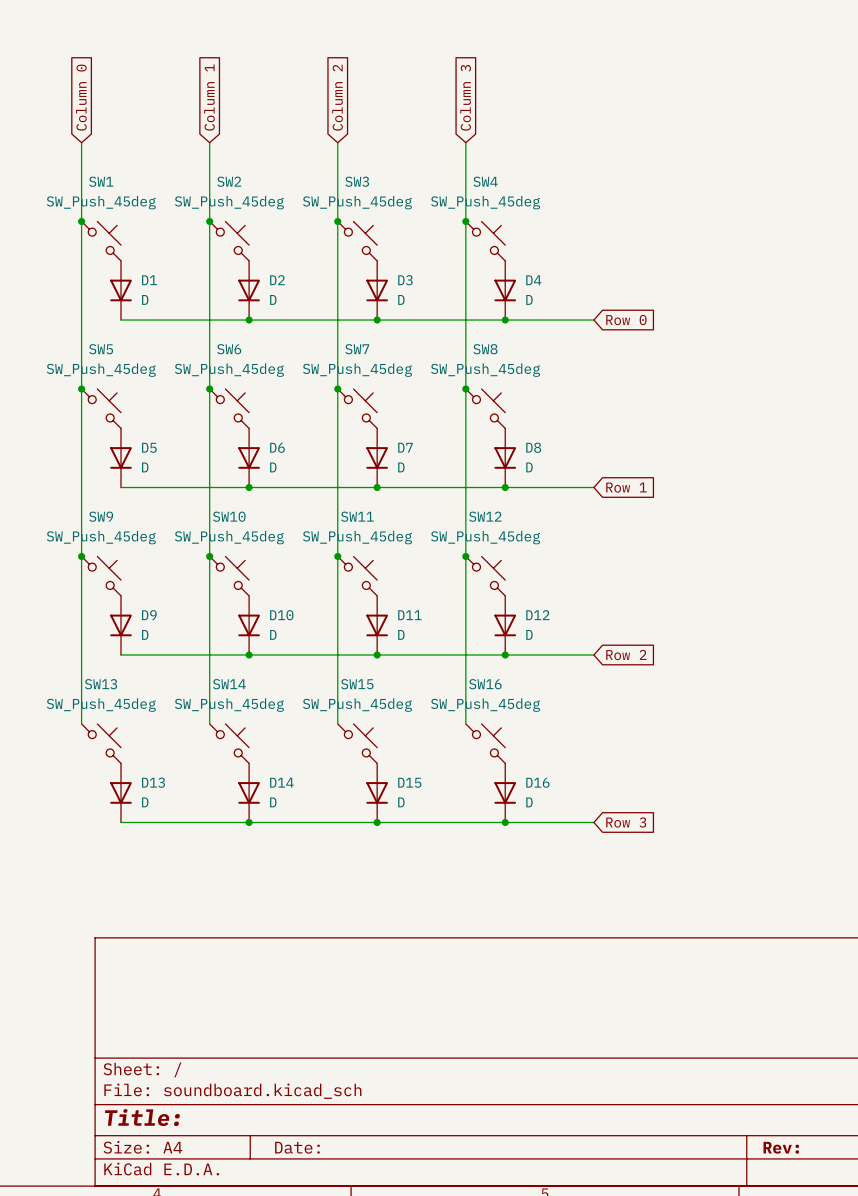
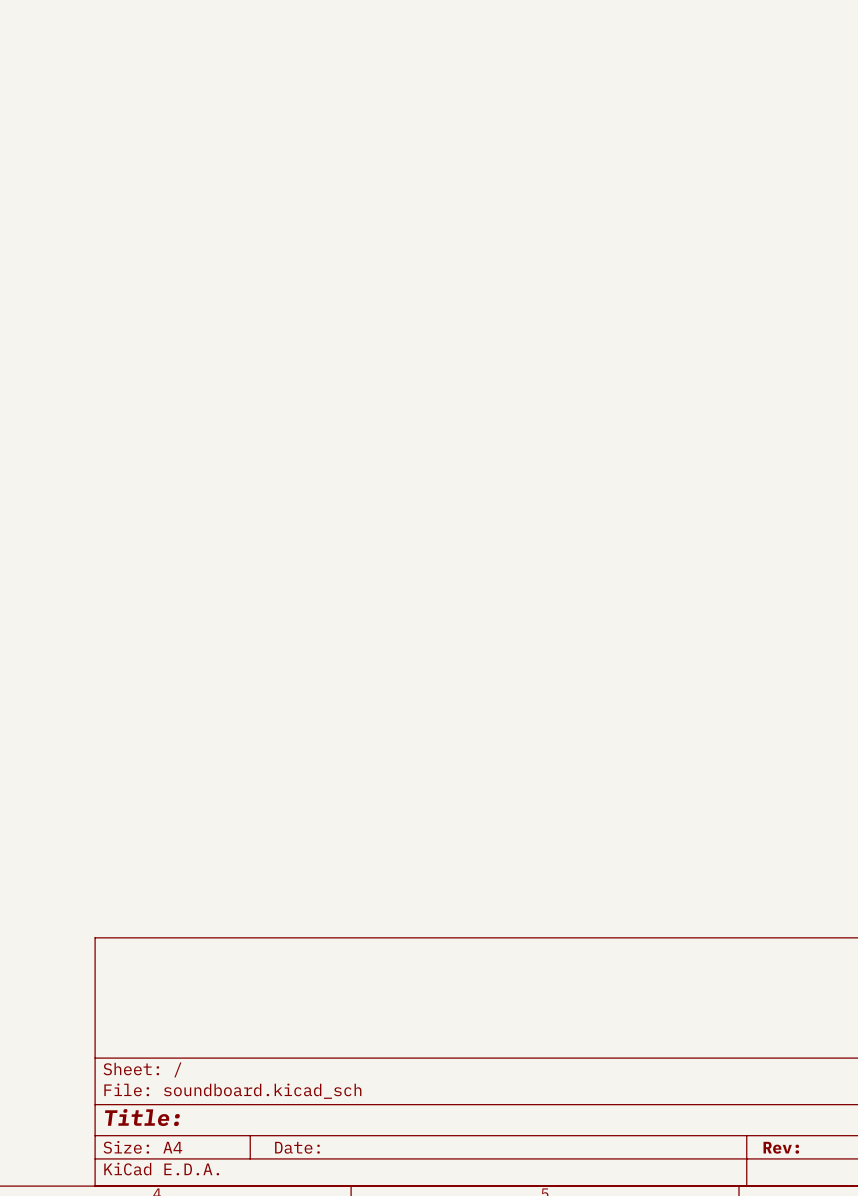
global label: Column 0 (81, 97) -> none
global label: Column 1 (209, 97) -> none
global label: Column 2 (337, 97) -> none
global label: Column 3 (465, 97) -> none
wire: (81, 142) (81, 723) -> none
wire: (209, 142) (209, 723) -> none
wire: (337, 142) (337, 723) -> none
wire: (465, 142) (465, 723) -> none
junction: (81, 221) -> none
junction: (209, 221) -> none
junction: (337, 221) -> none
junction: (465, 221) -> none
SW1: SW_Push_45deg (101, 241) -> none
SW2: SW_Push_45deg (229, 241) -> none
SW3: SW_Push_45deg (357, 241) -> none
SW4: SW_Push_45deg (485, 241) -> none
D1: D (121, 290) -> none
D2: D (249, 290) -> none
D3: D (377, 290) -> none
D4: D (505, 290) -> none
wire: (121, 320) (593, 320) -> none
junction: (249, 320) -> none
junction: (377, 320) -> none
junction: (505, 320) -> none
global label: Row 0 (626, 320) -> none
junction: (81, 388) -> none
junction: (209, 388) -> none
junction: (337, 388) -> none
junction: (465, 388) -> none
SW5: SW_Push_45deg (101, 408) -> none
SW6: SW_Push_45deg (229, 408) -> none
SW7: SW_Push_45deg (357, 408) -> none
SW8: SW_Push_45deg (485, 408) -> none
D5: D (121, 457) -> none
D6: D (249, 457) -> none
D7: D (377, 457) -> none
D8: D (505, 457) -> none
wire: (121, 487) (593, 487) -> none
junction: (249, 487) -> none
junction: (377, 487) -> none
junction: (505, 487) -> none
global label: Row 1 (626, 487) -> none
junction: (81, 556) -> none
junction: (209, 556) -> none
junction: (337, 556) -> none
junction: (465, 556) -> none
SW9: SW_Push_45deg (101, 576) -> none
SW10: SW_Push_45deg (229, 576) -> none
SW11: SW_Push_45deg (357, 576) -> none
SW12: SW_Push_45deg (485, 576) -> none
D9: D (121, 625) -> none
D10: D (249, 625) -> none
D11: D (377, 625) -> none
D12: D (505, 625) -> none
wire: (121, 655) (593, 655) -> none
junction: (249, 655) -> none
junction: (377, 655) -> none
junction: (505, 655) -> none
global label: Row 2 (626, 655) -> none
SW13: SW_Push_45deg (101, 743) -> none
SW14: SW_Push_45deg (229, 743) -> none
SW15: SW_Push_45deg (357, 743) -> none
SW16: SW_Push_45deg (485, 743) -> none
D13: D (121, 792) -> none
D14: D (249, 792) -> none
D15: D (377, 792) -> none
D16: D (505, 792) -> none
wire: (121, 822) (593, 822) -> none
junction: (249, 822) -> none
junction: (377, 822) -> none
junction: (505, 822) -> none
global label: Row 3 (626, 822) -> none

